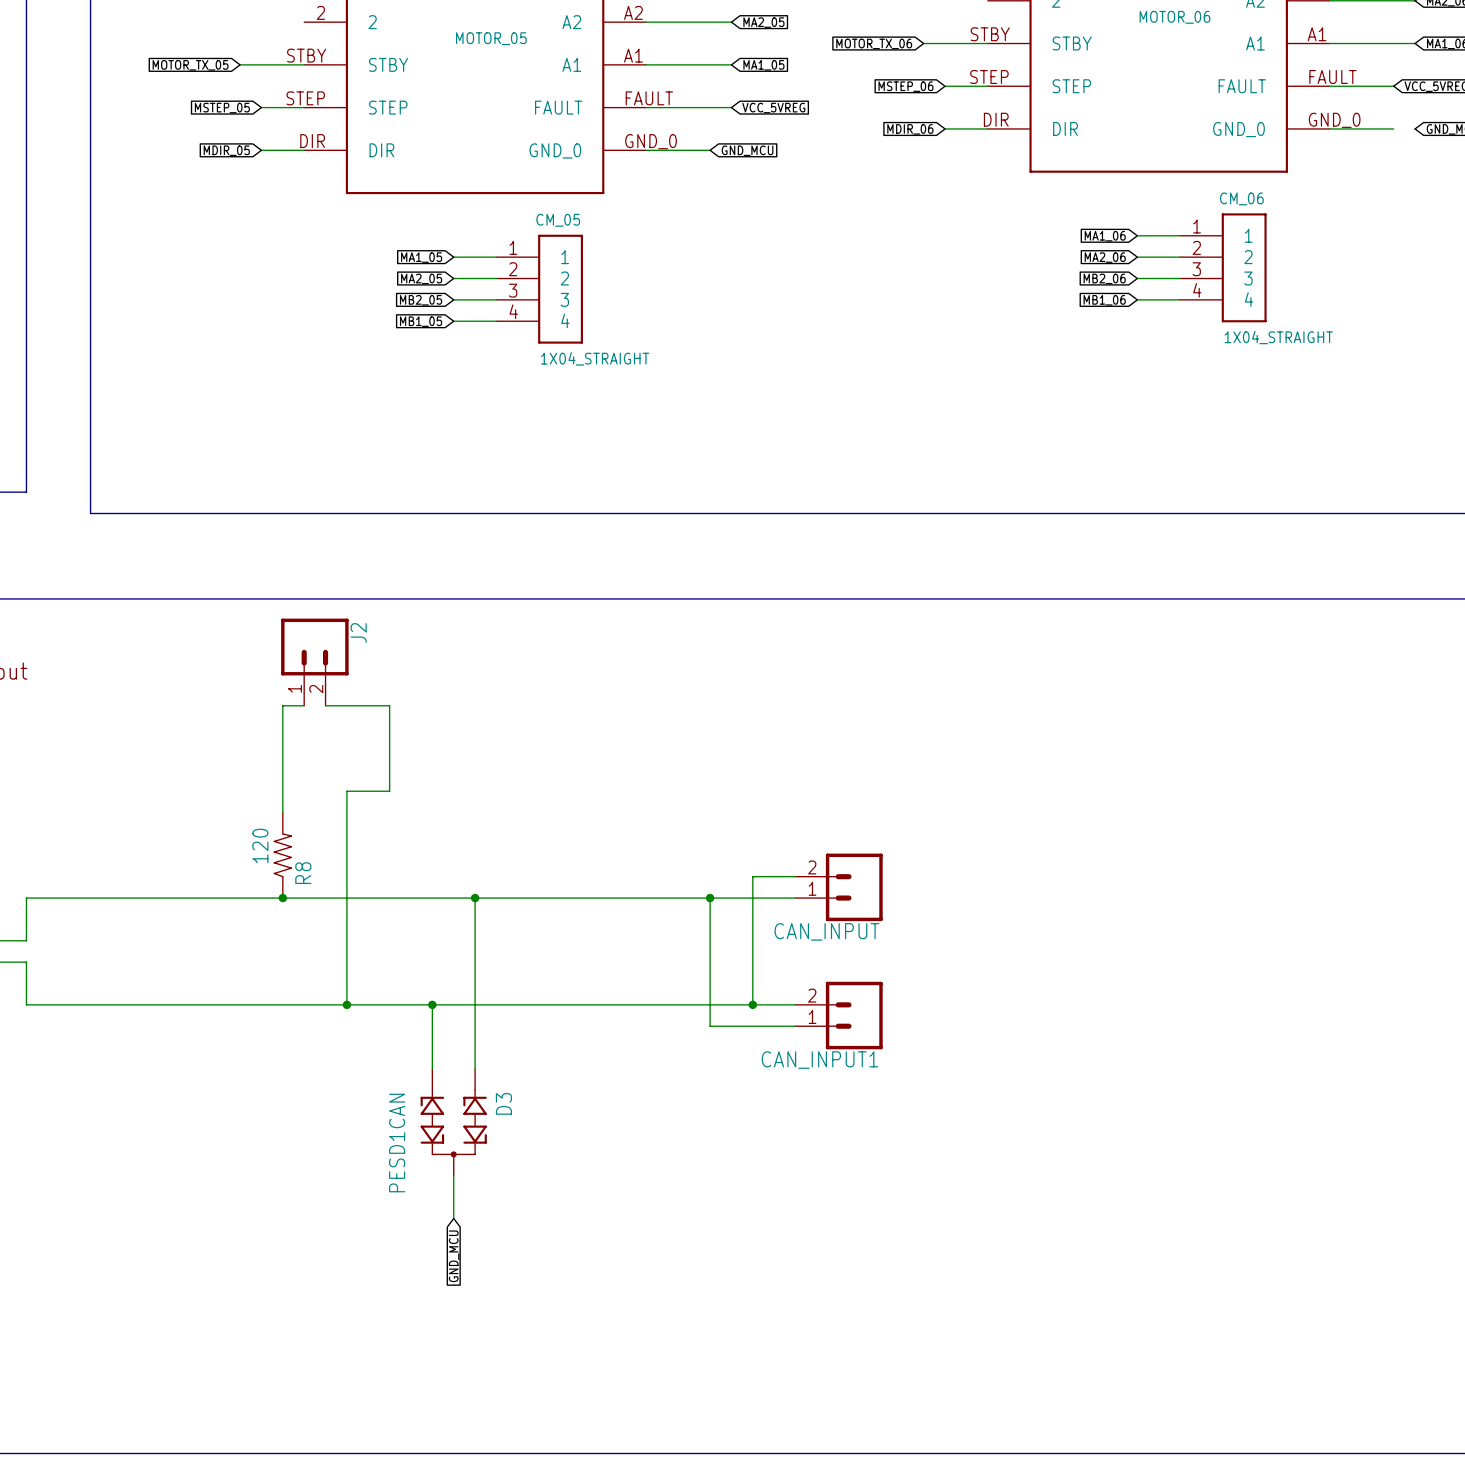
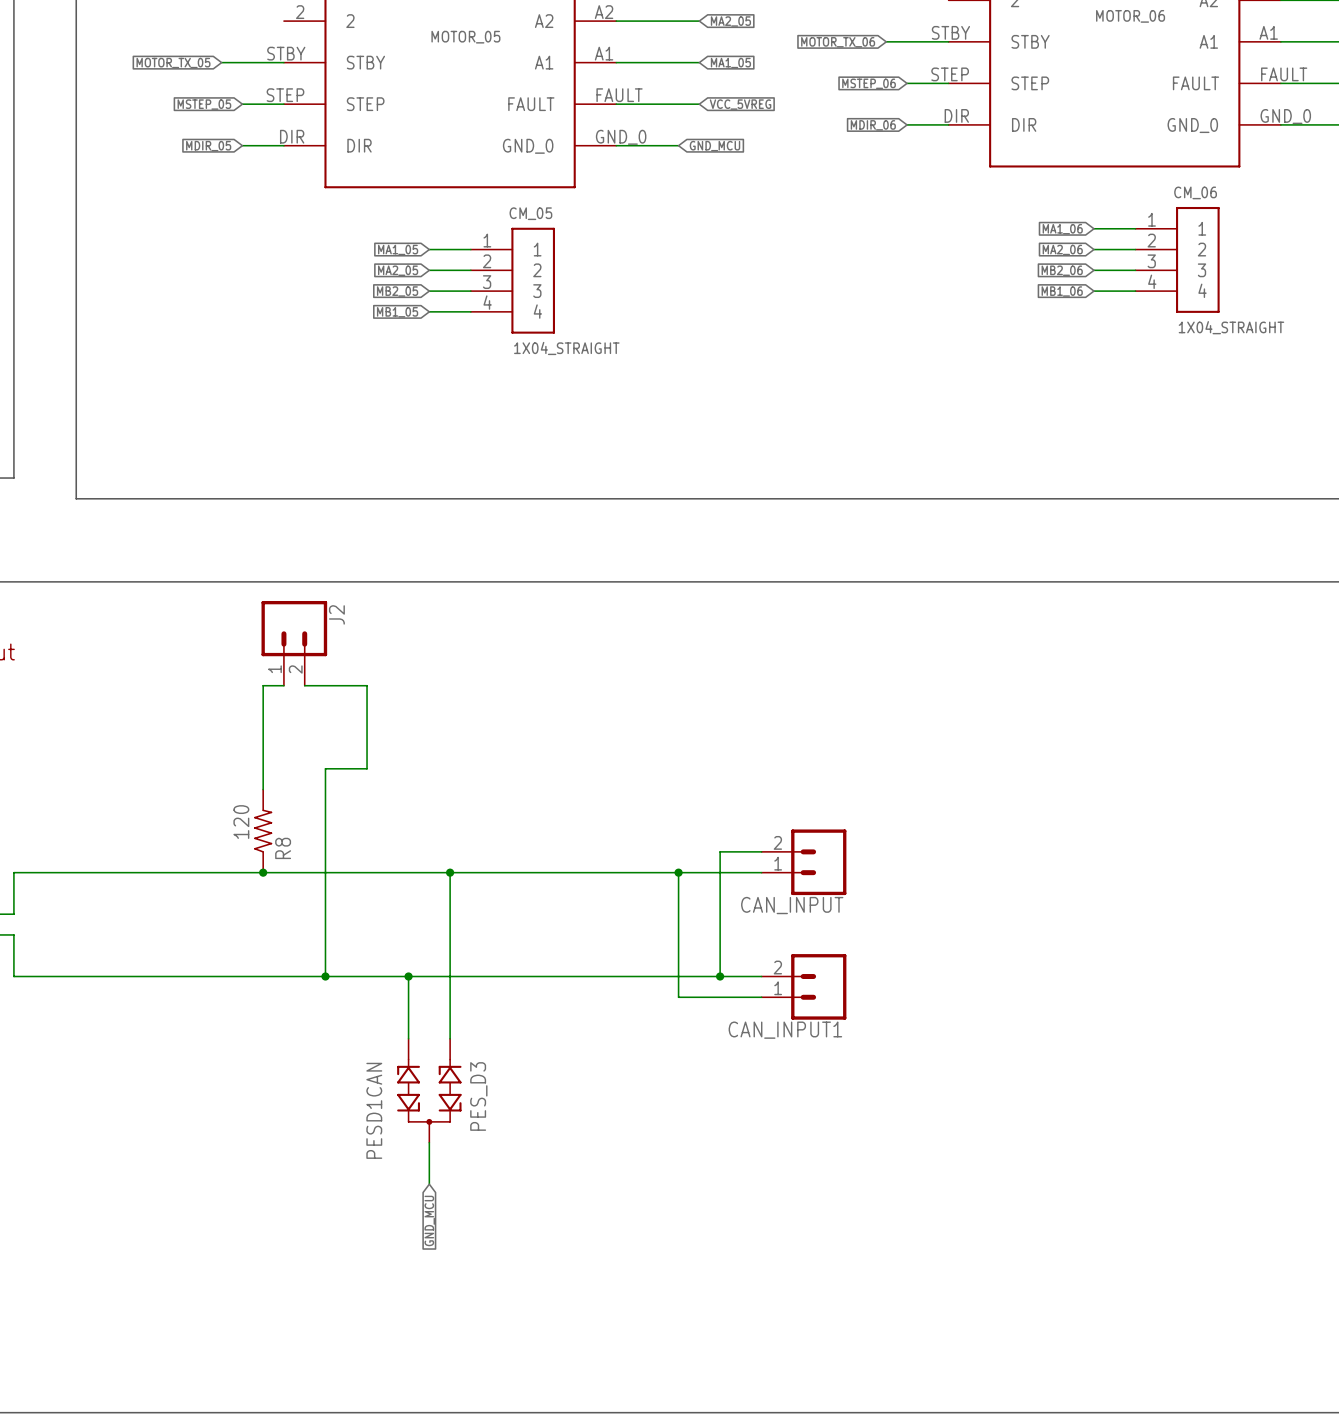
D3 name: D3 (503, 1103) -> PES_D3 (478, 1096)

